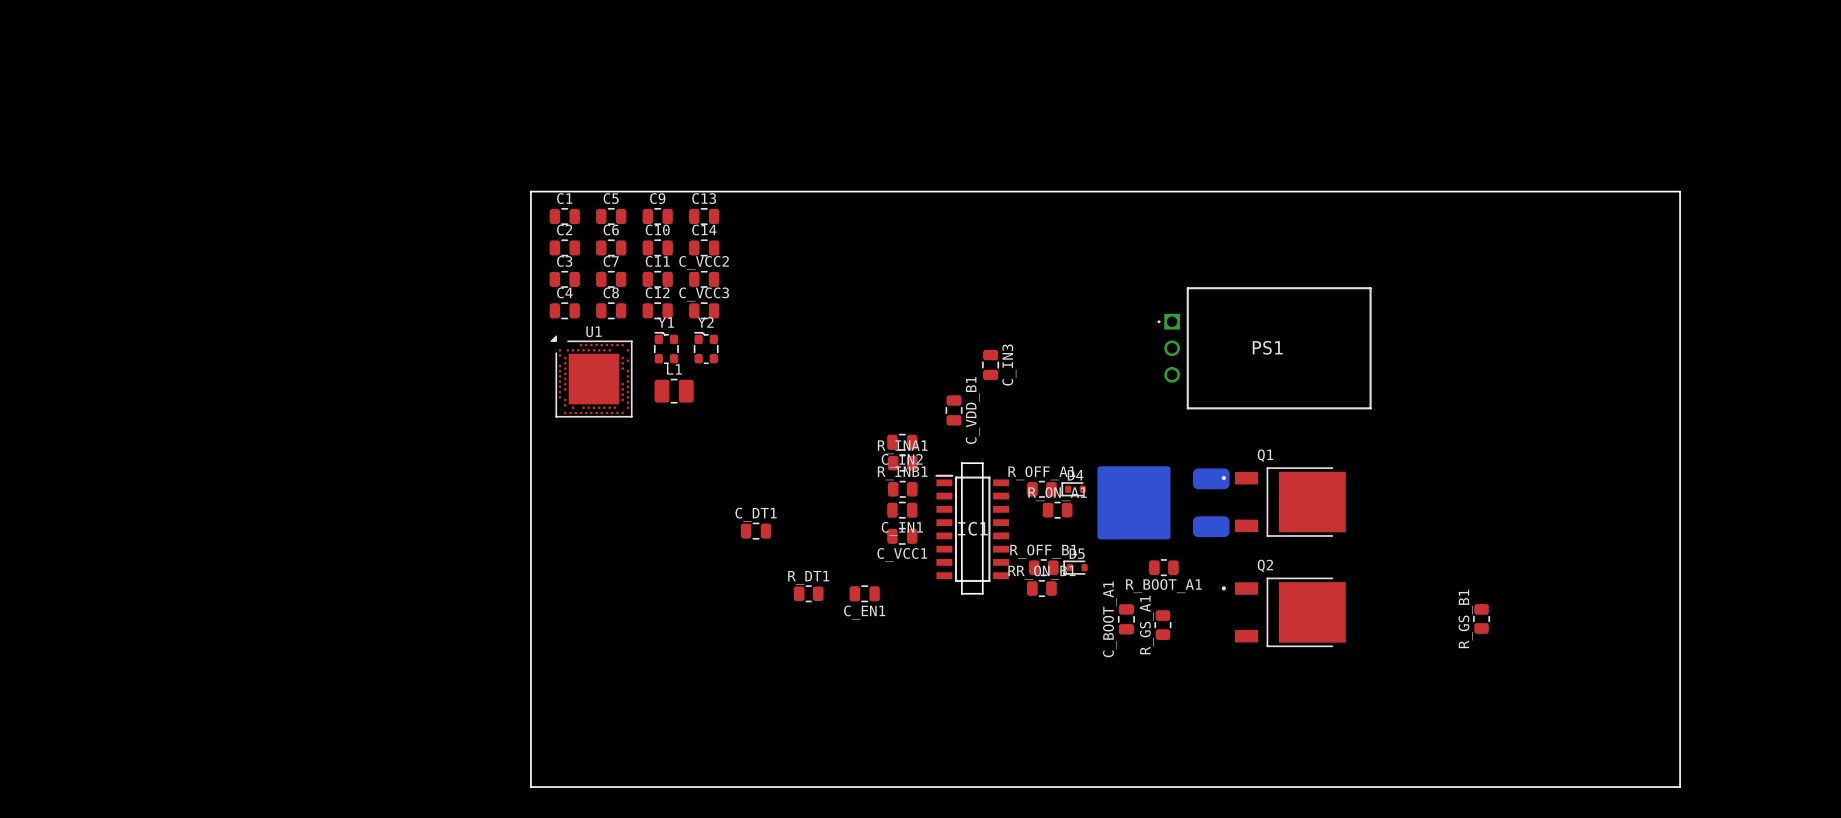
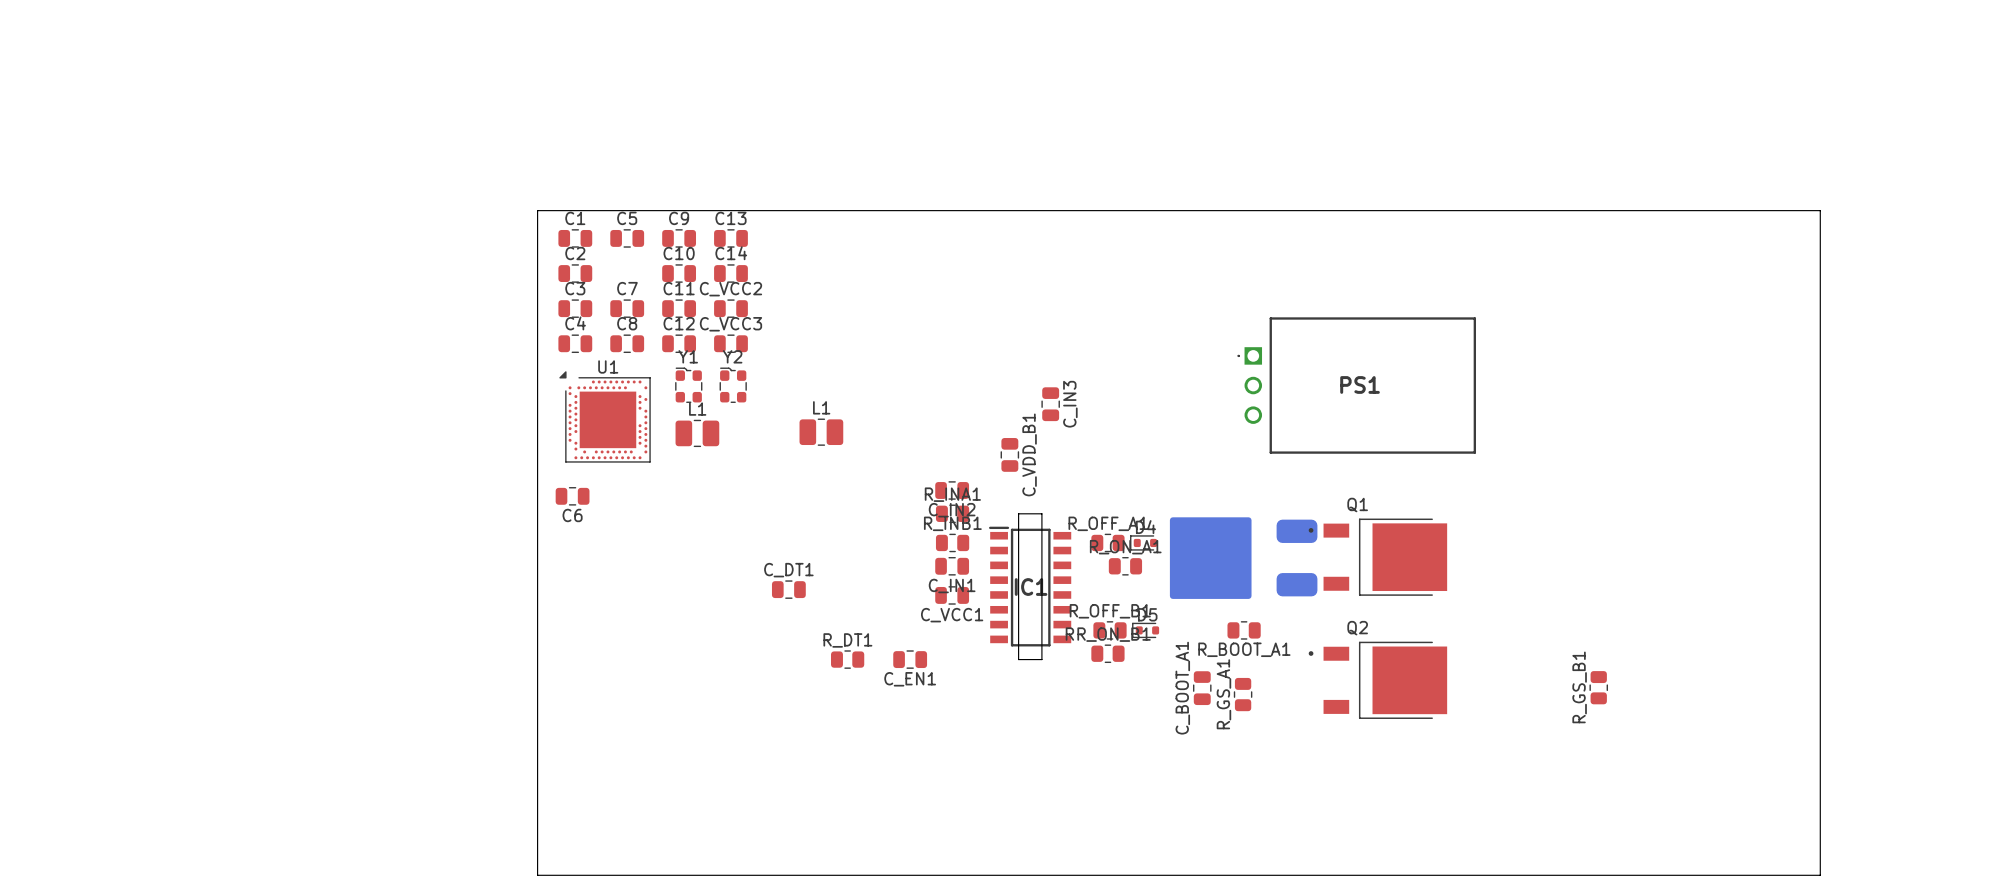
C6 name position: C6 (611, 230) -> C6 (572, 515)
C6 position: (611, 247) -> (572, 496)
L1: none -> (821, 432)

